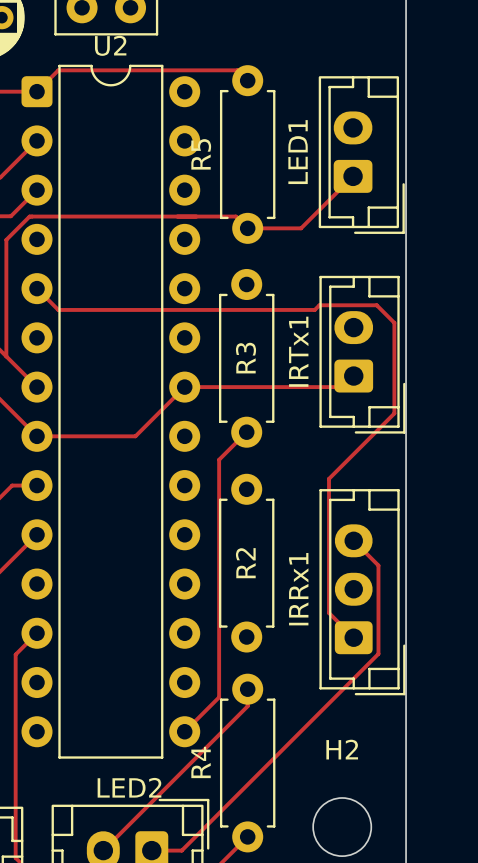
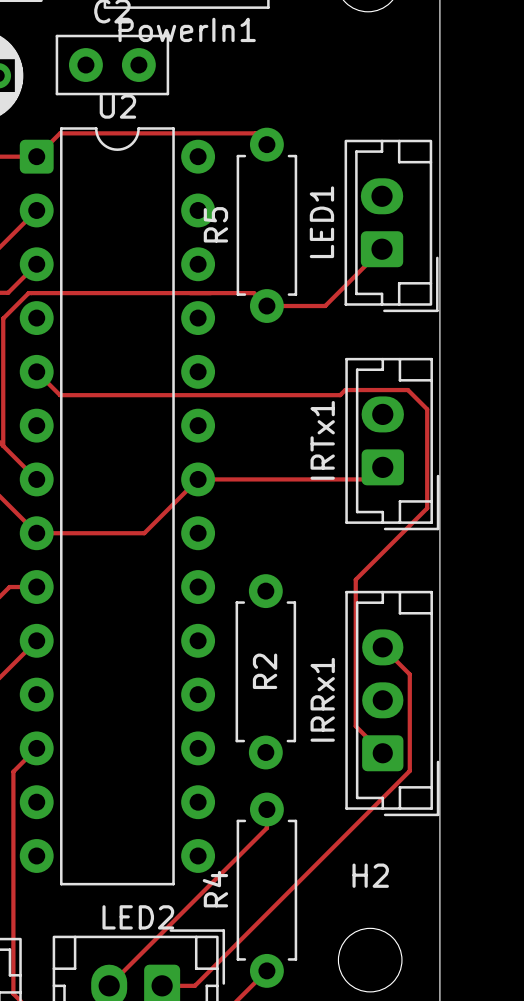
R3: (246, 358) -> none
track: (246, 432) (219, 459) (219, 697) (184, 731) -> none

